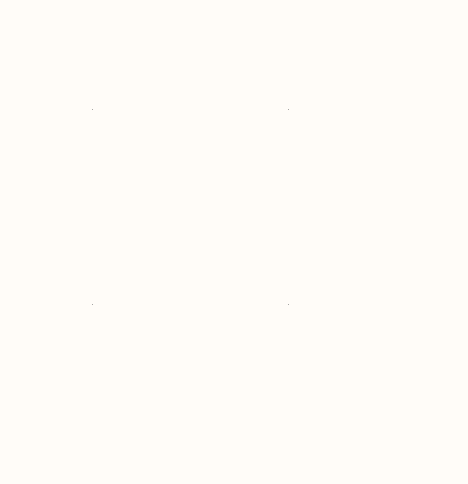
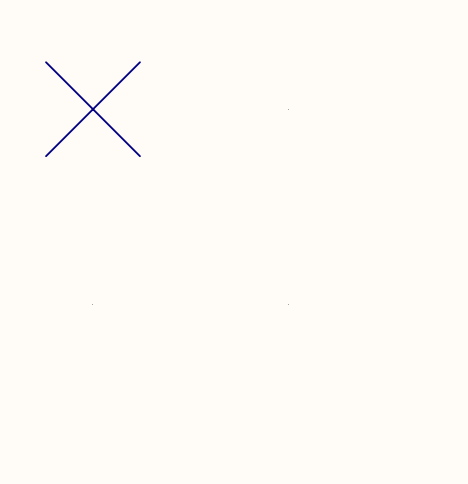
no-connect mark: none -> (92, 109)

